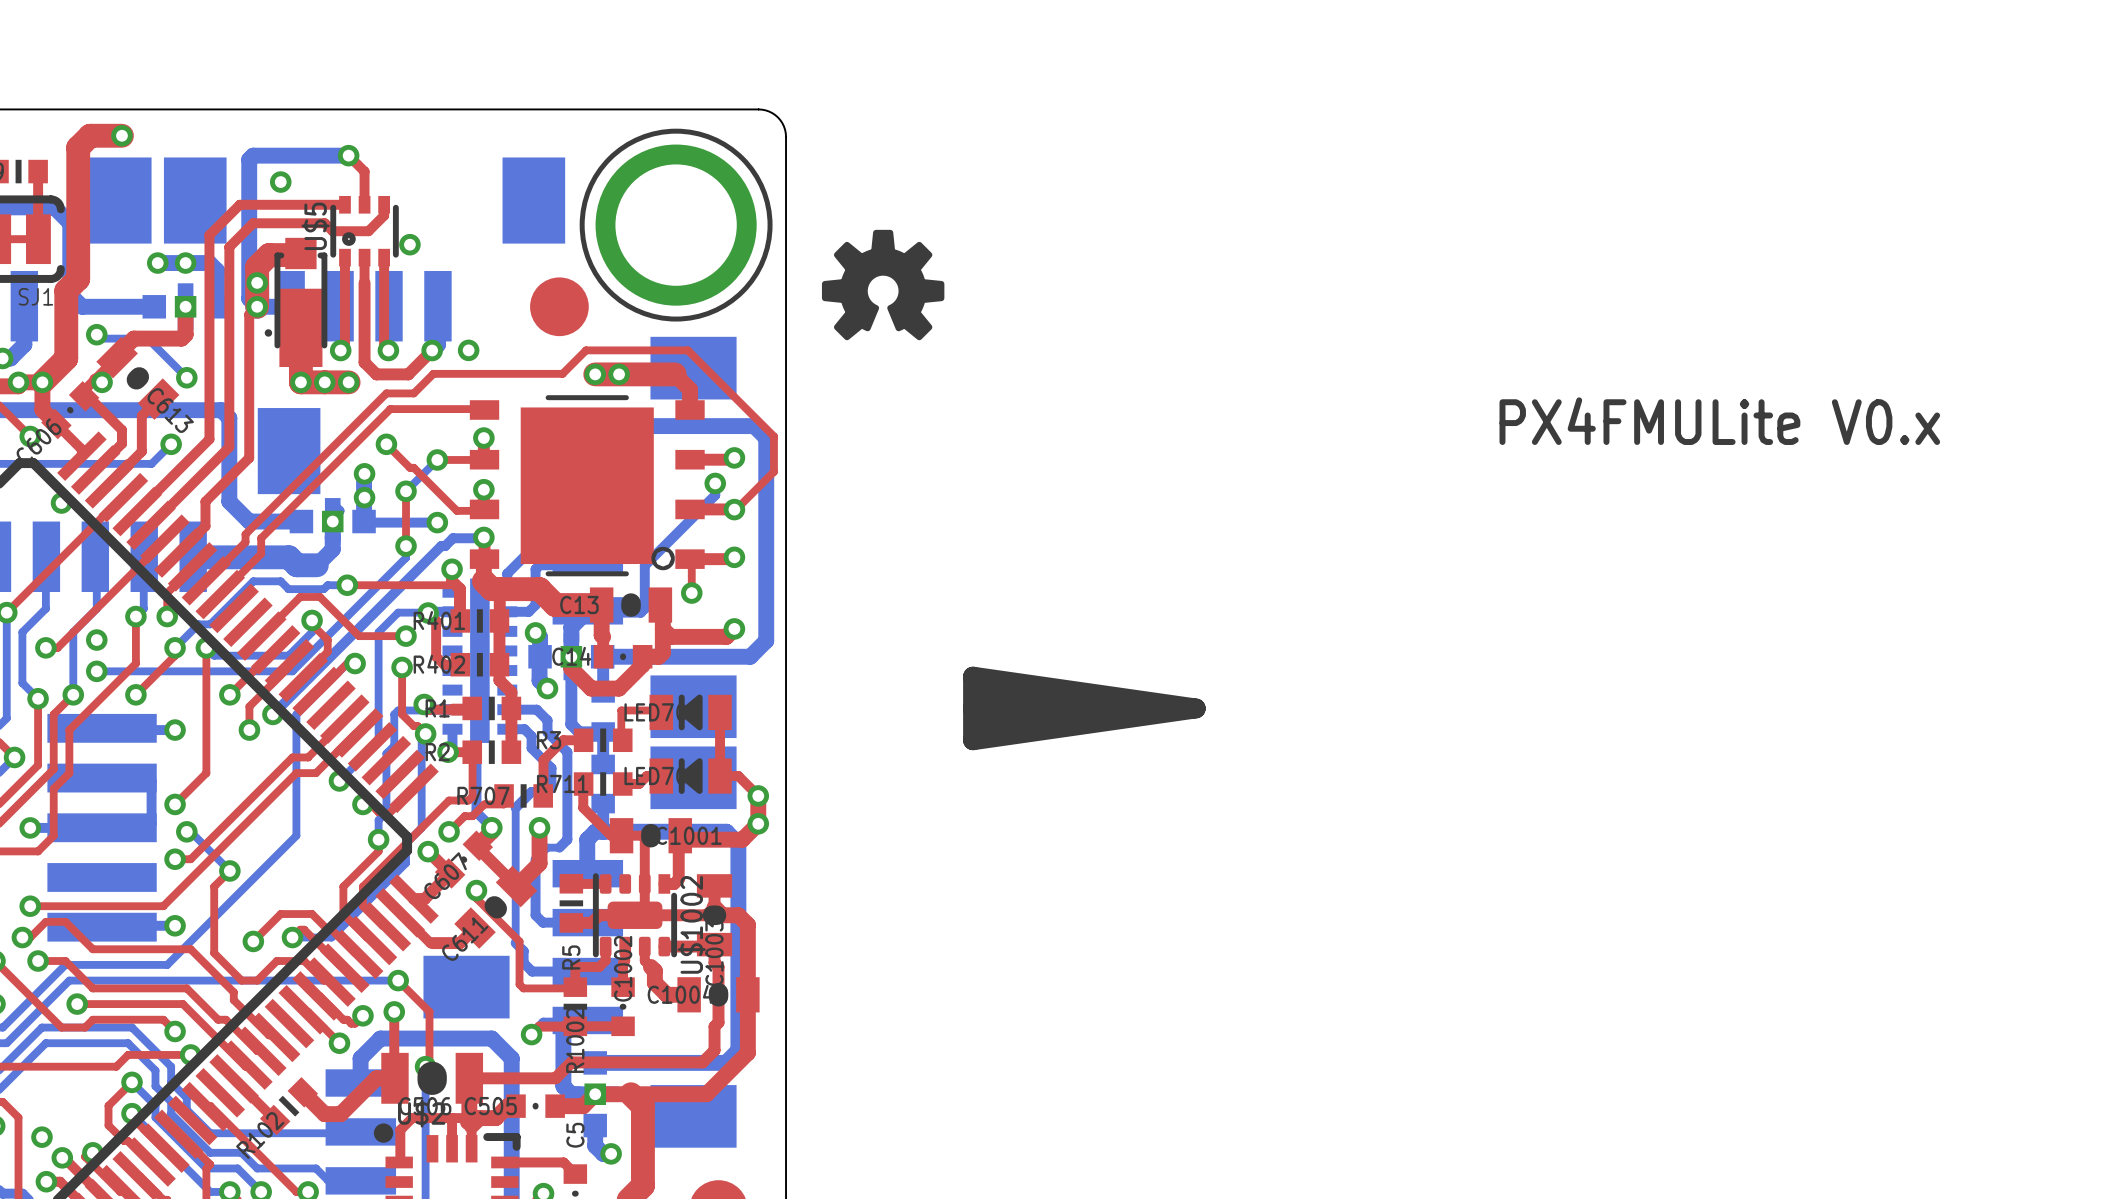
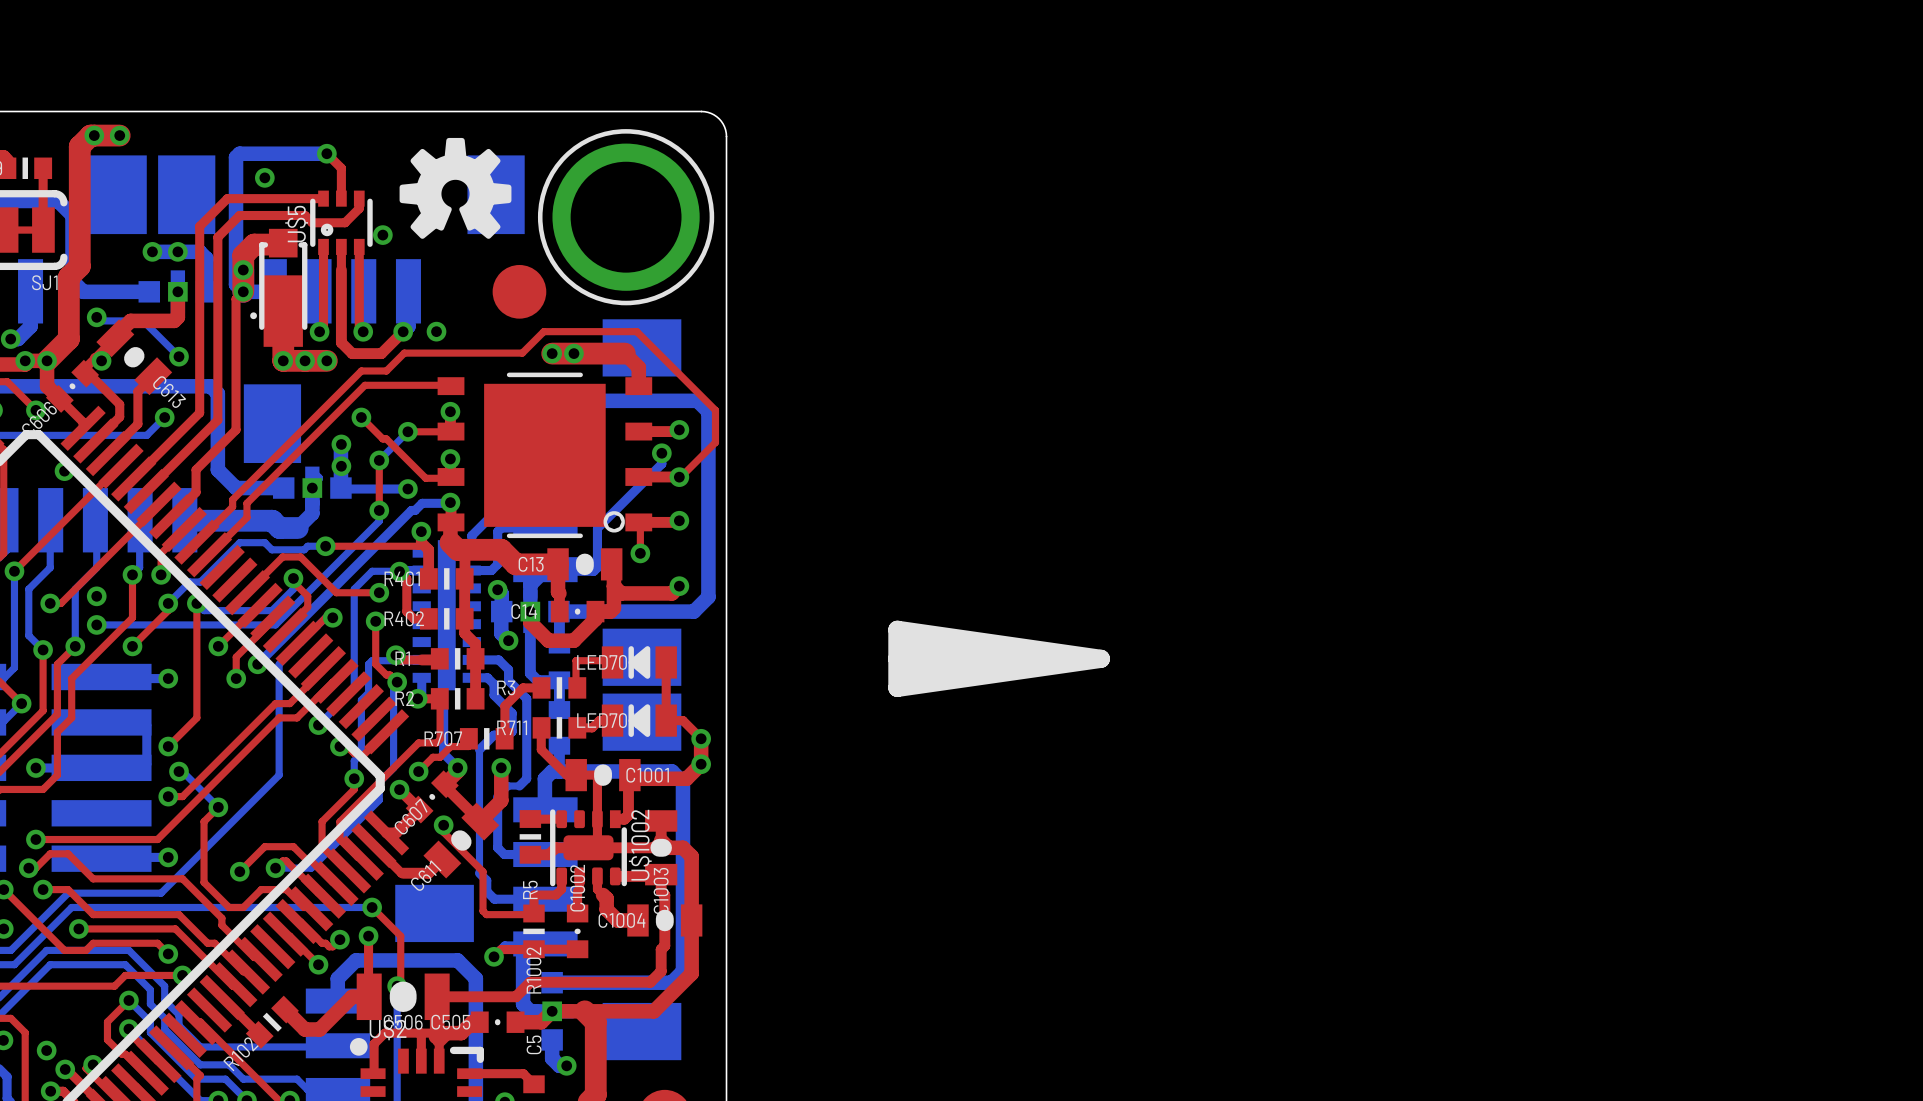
via: none -> (94, 135)
drawing position: (883, 285) -> (455, 188)
text: PX4FMULite V0.x (1719, 421) -> none

